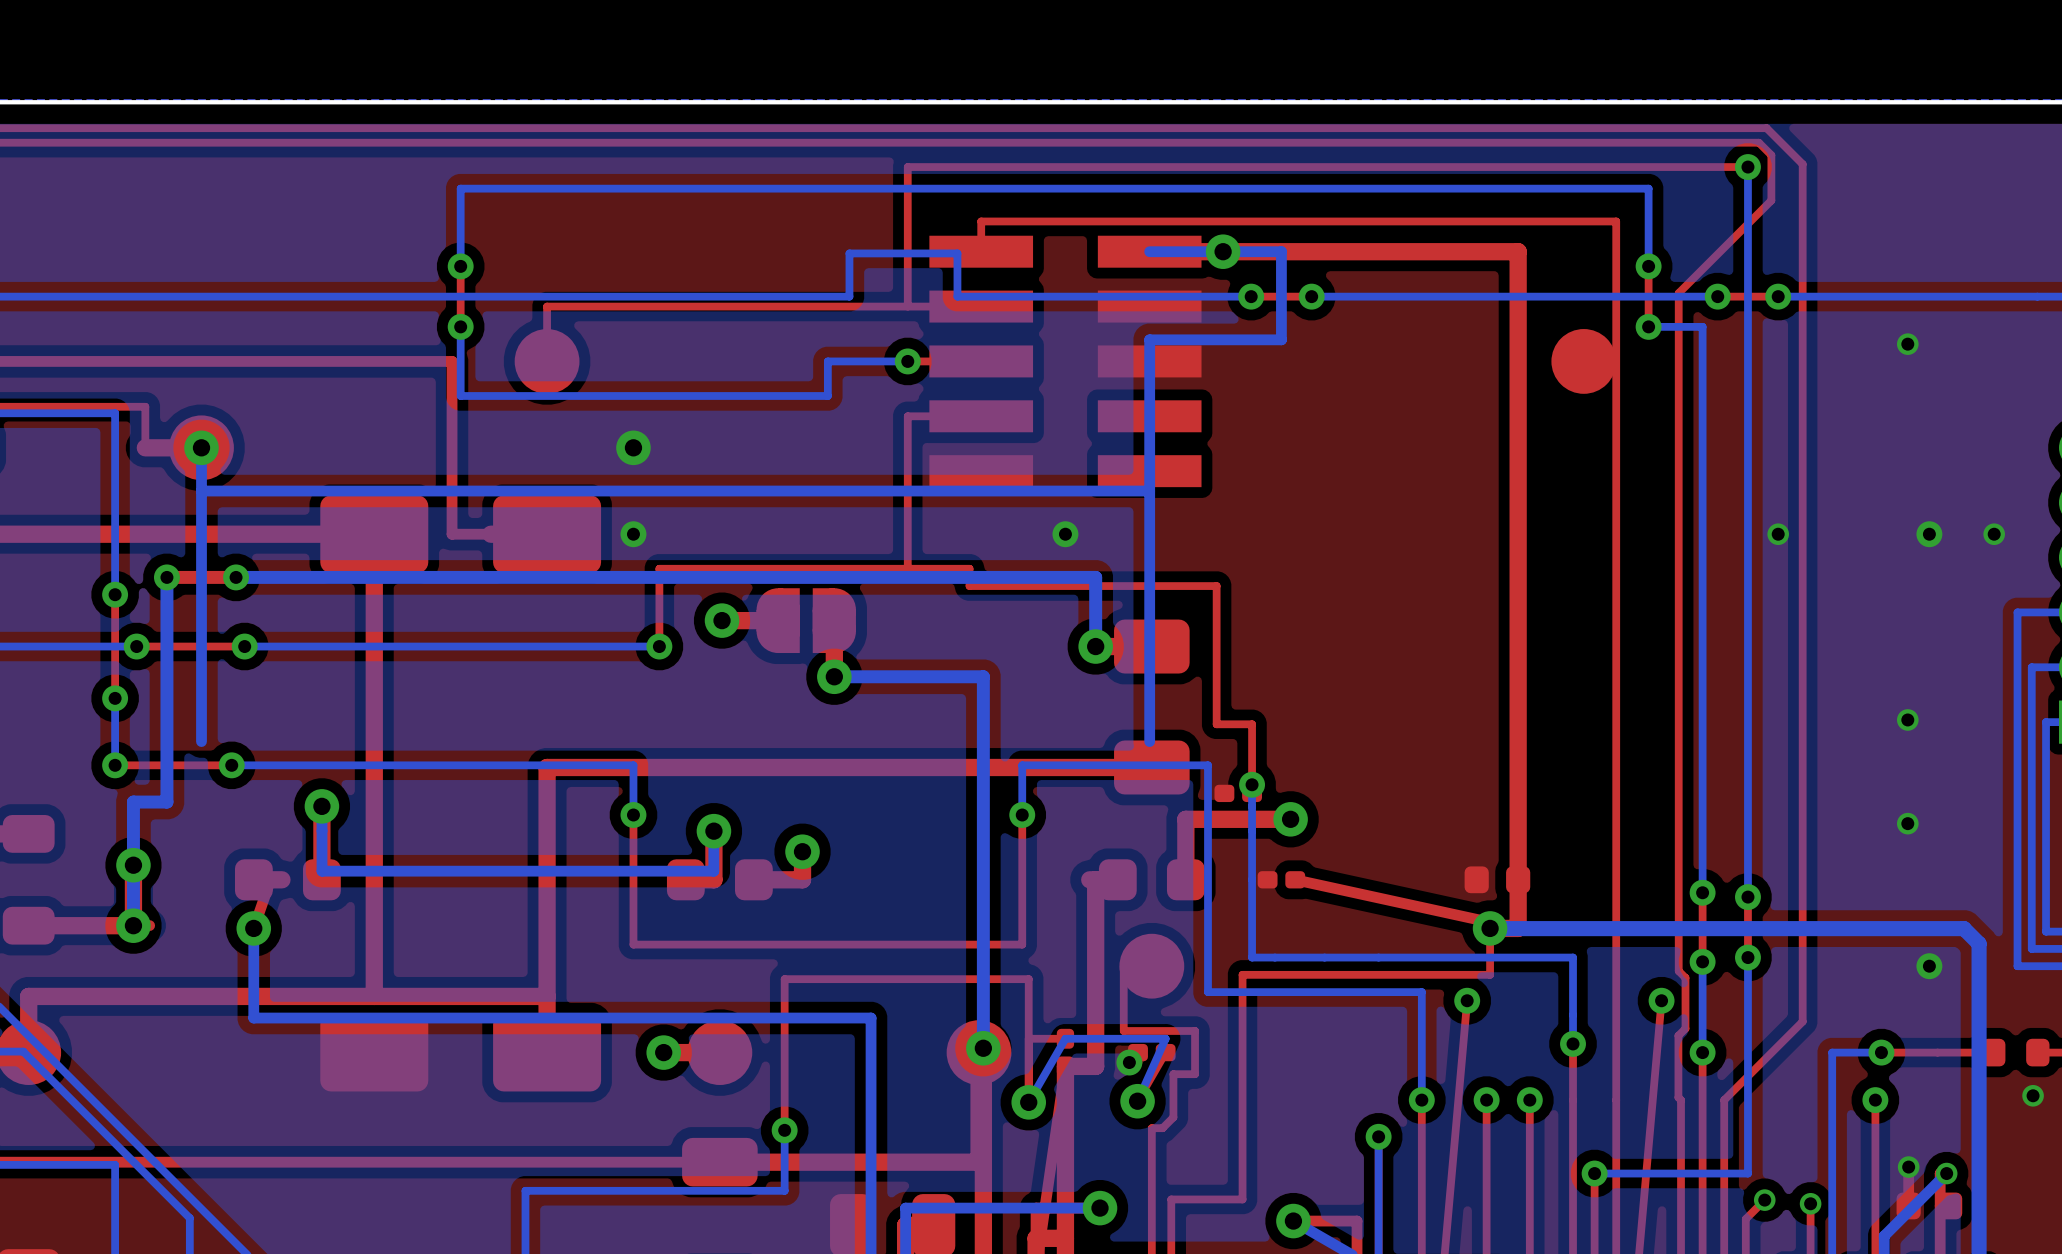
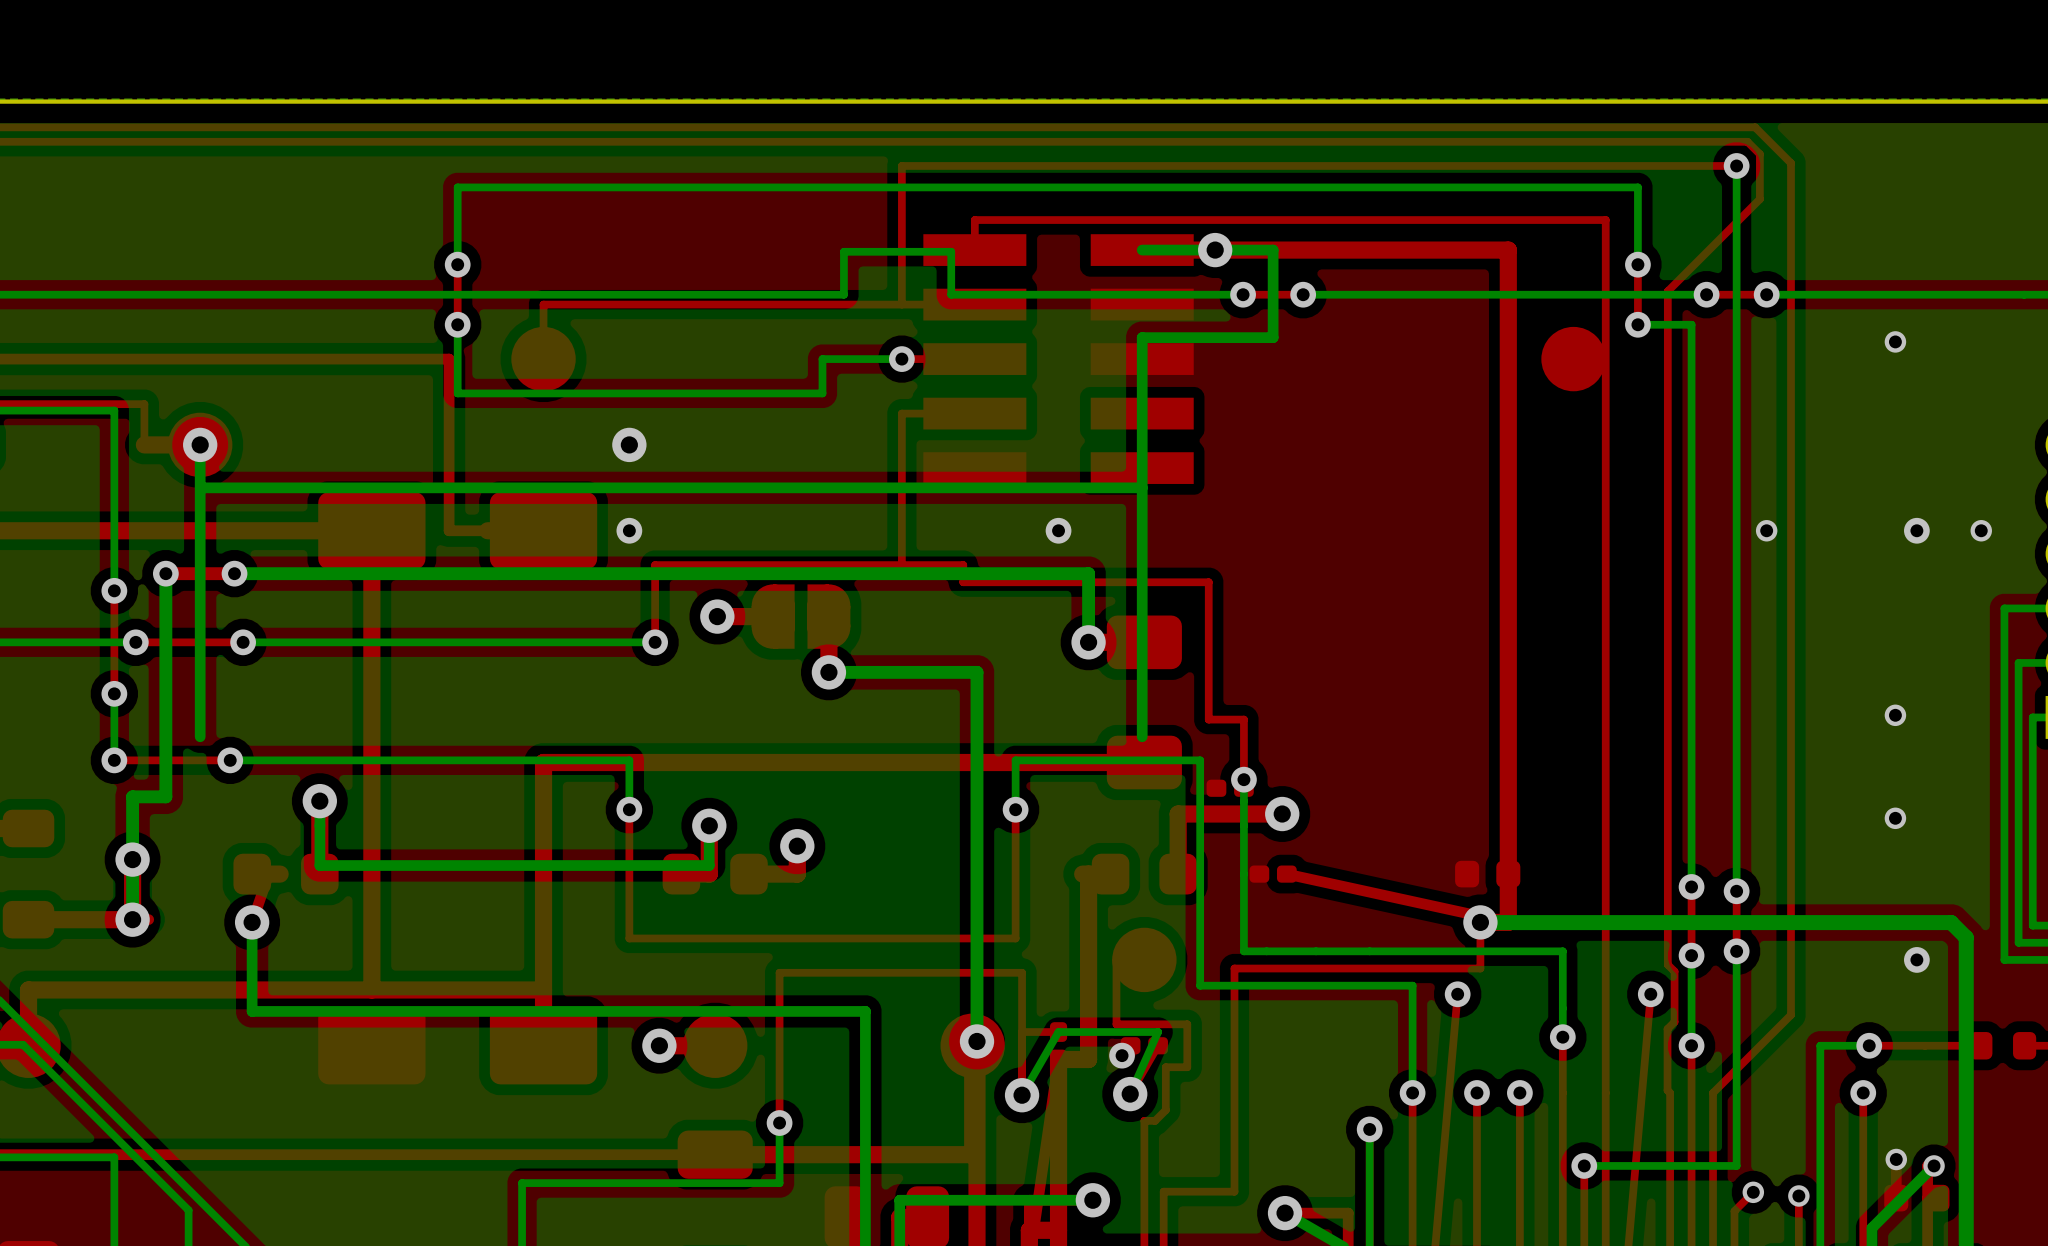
via: (2033, 1095) -> none

